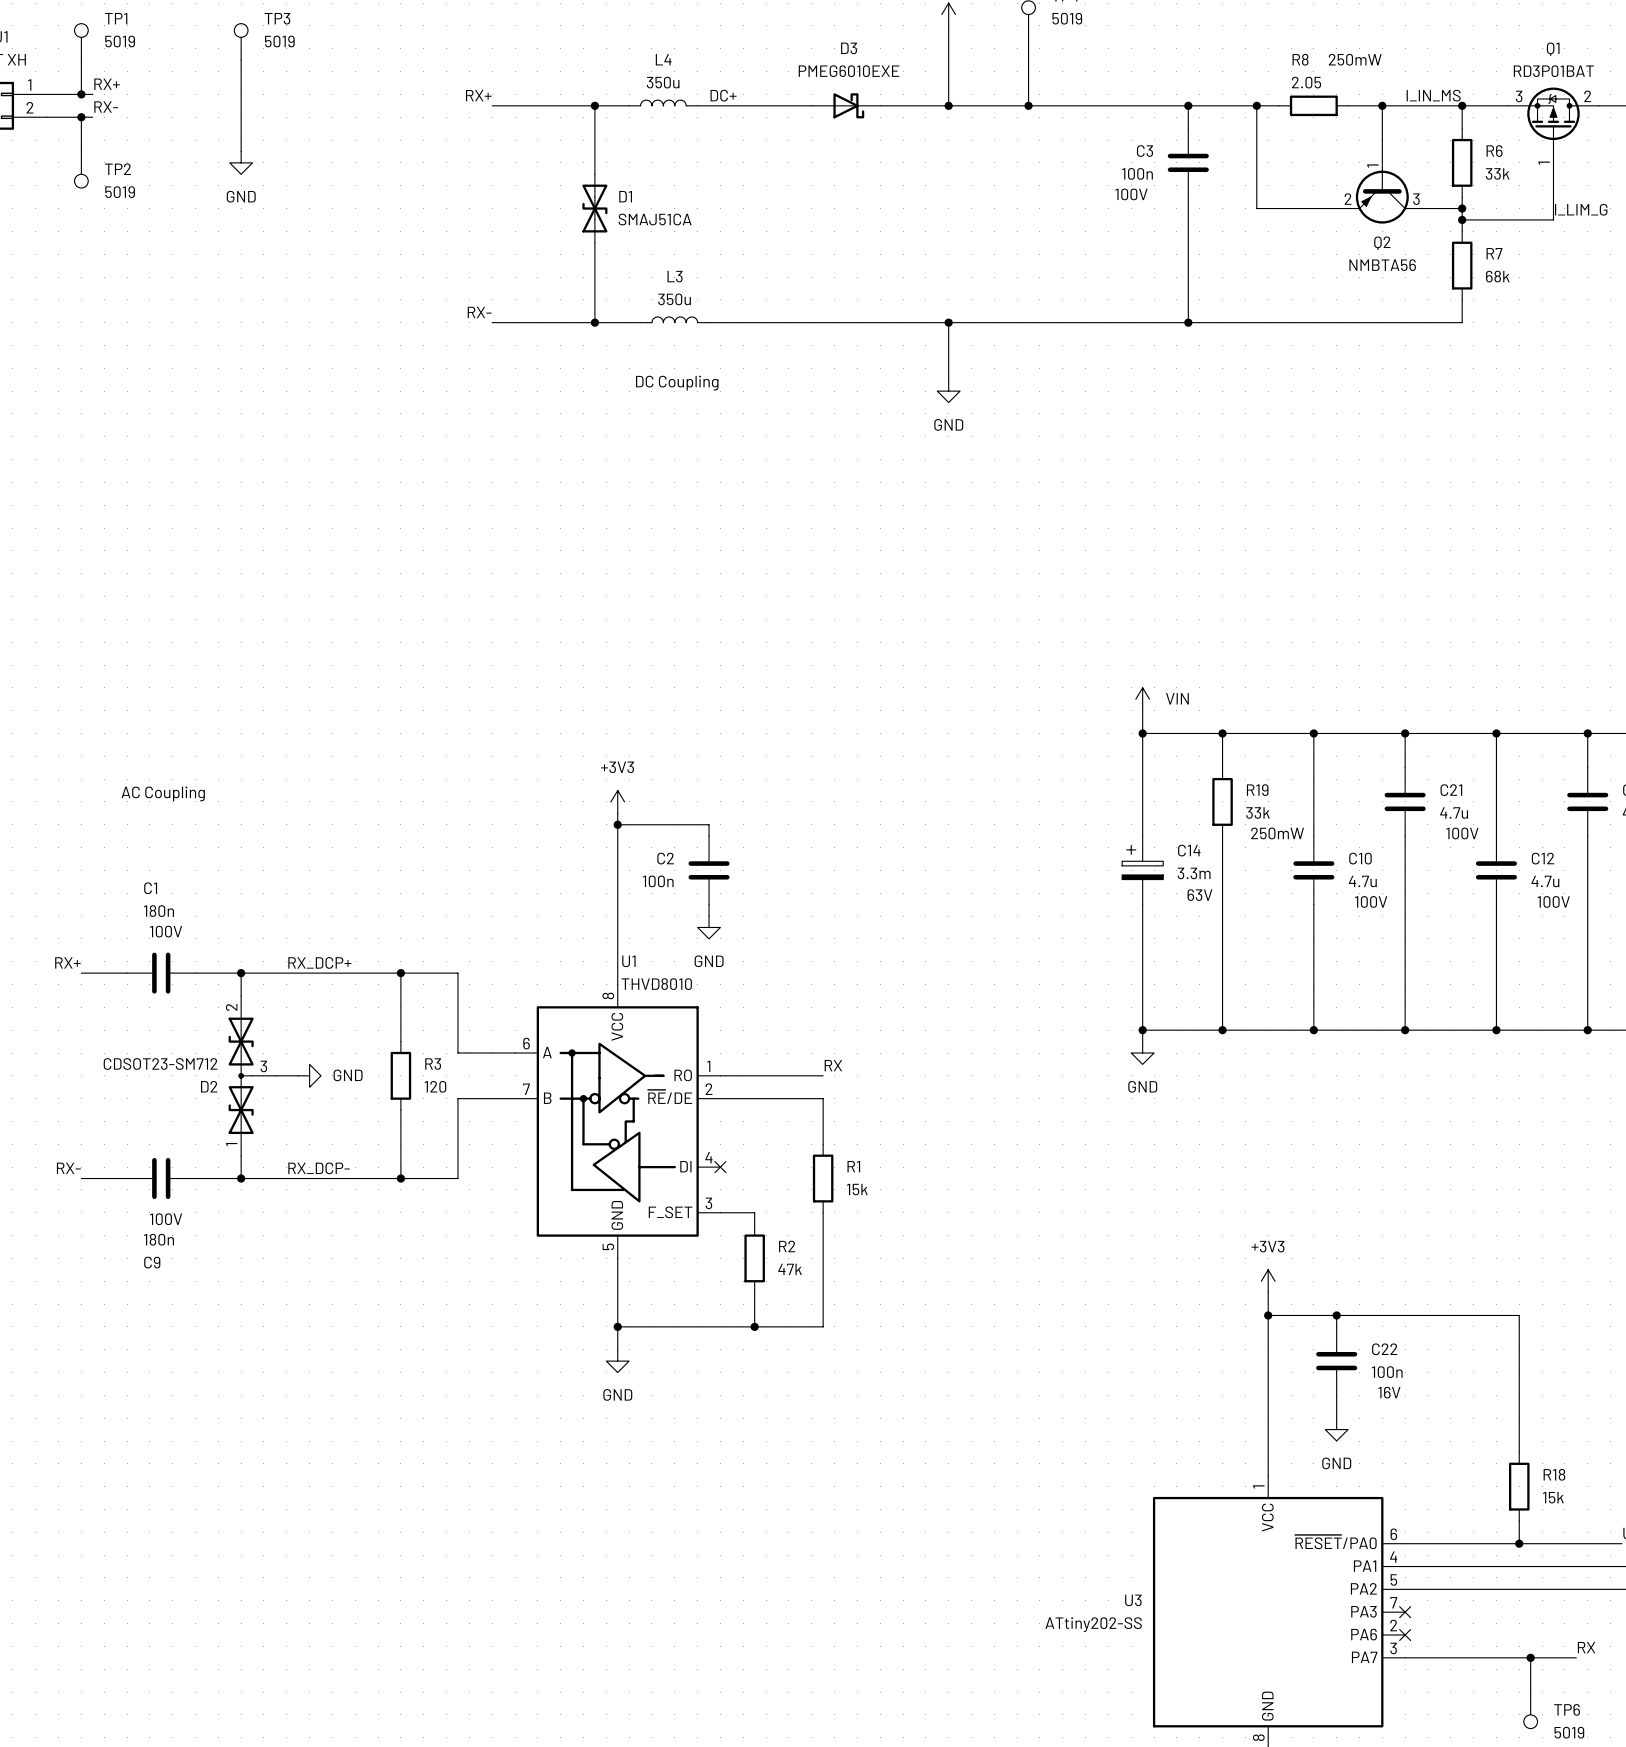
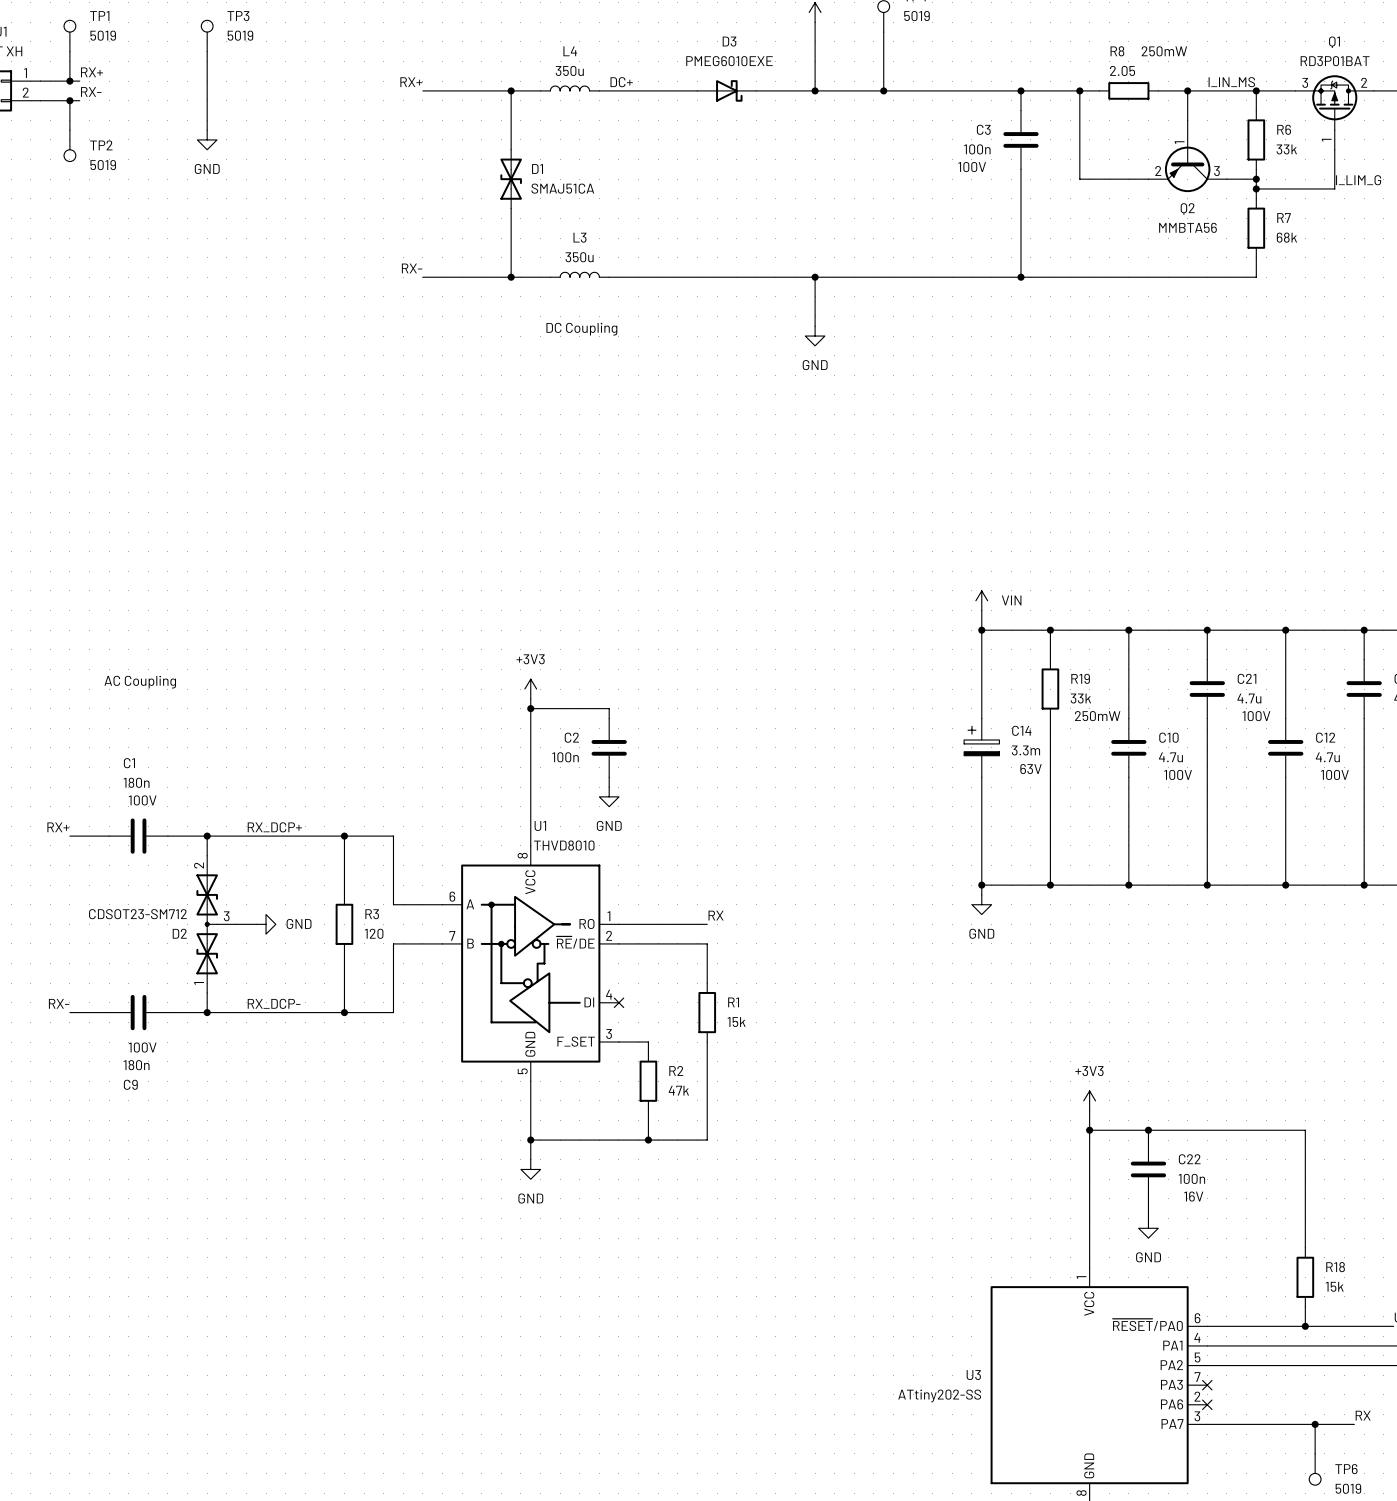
Q2 value: NMBTA56 (1382, 265) -> MMBTA56 (1187, 227)

